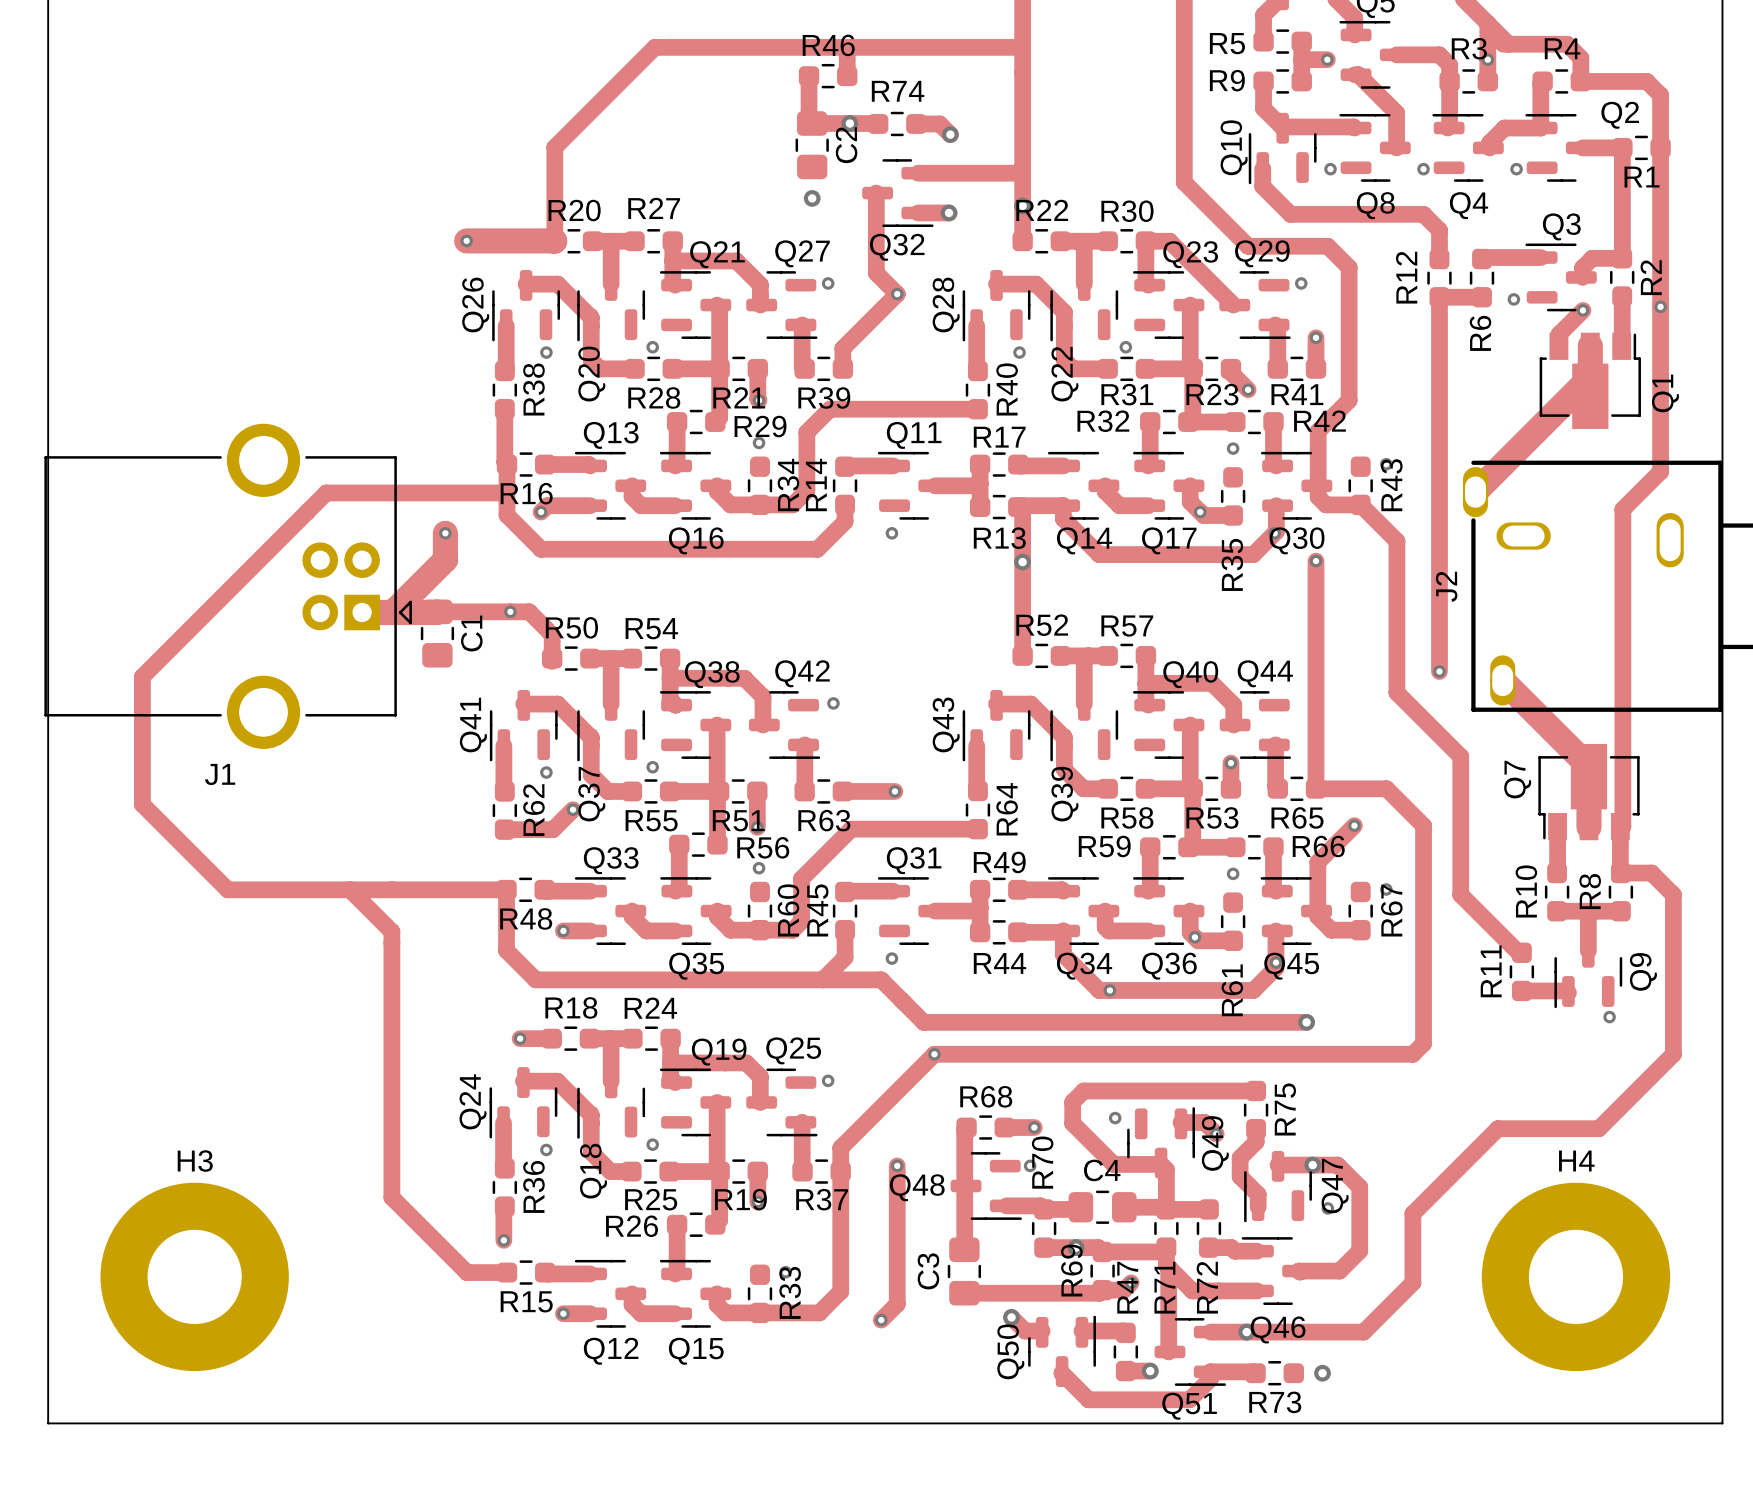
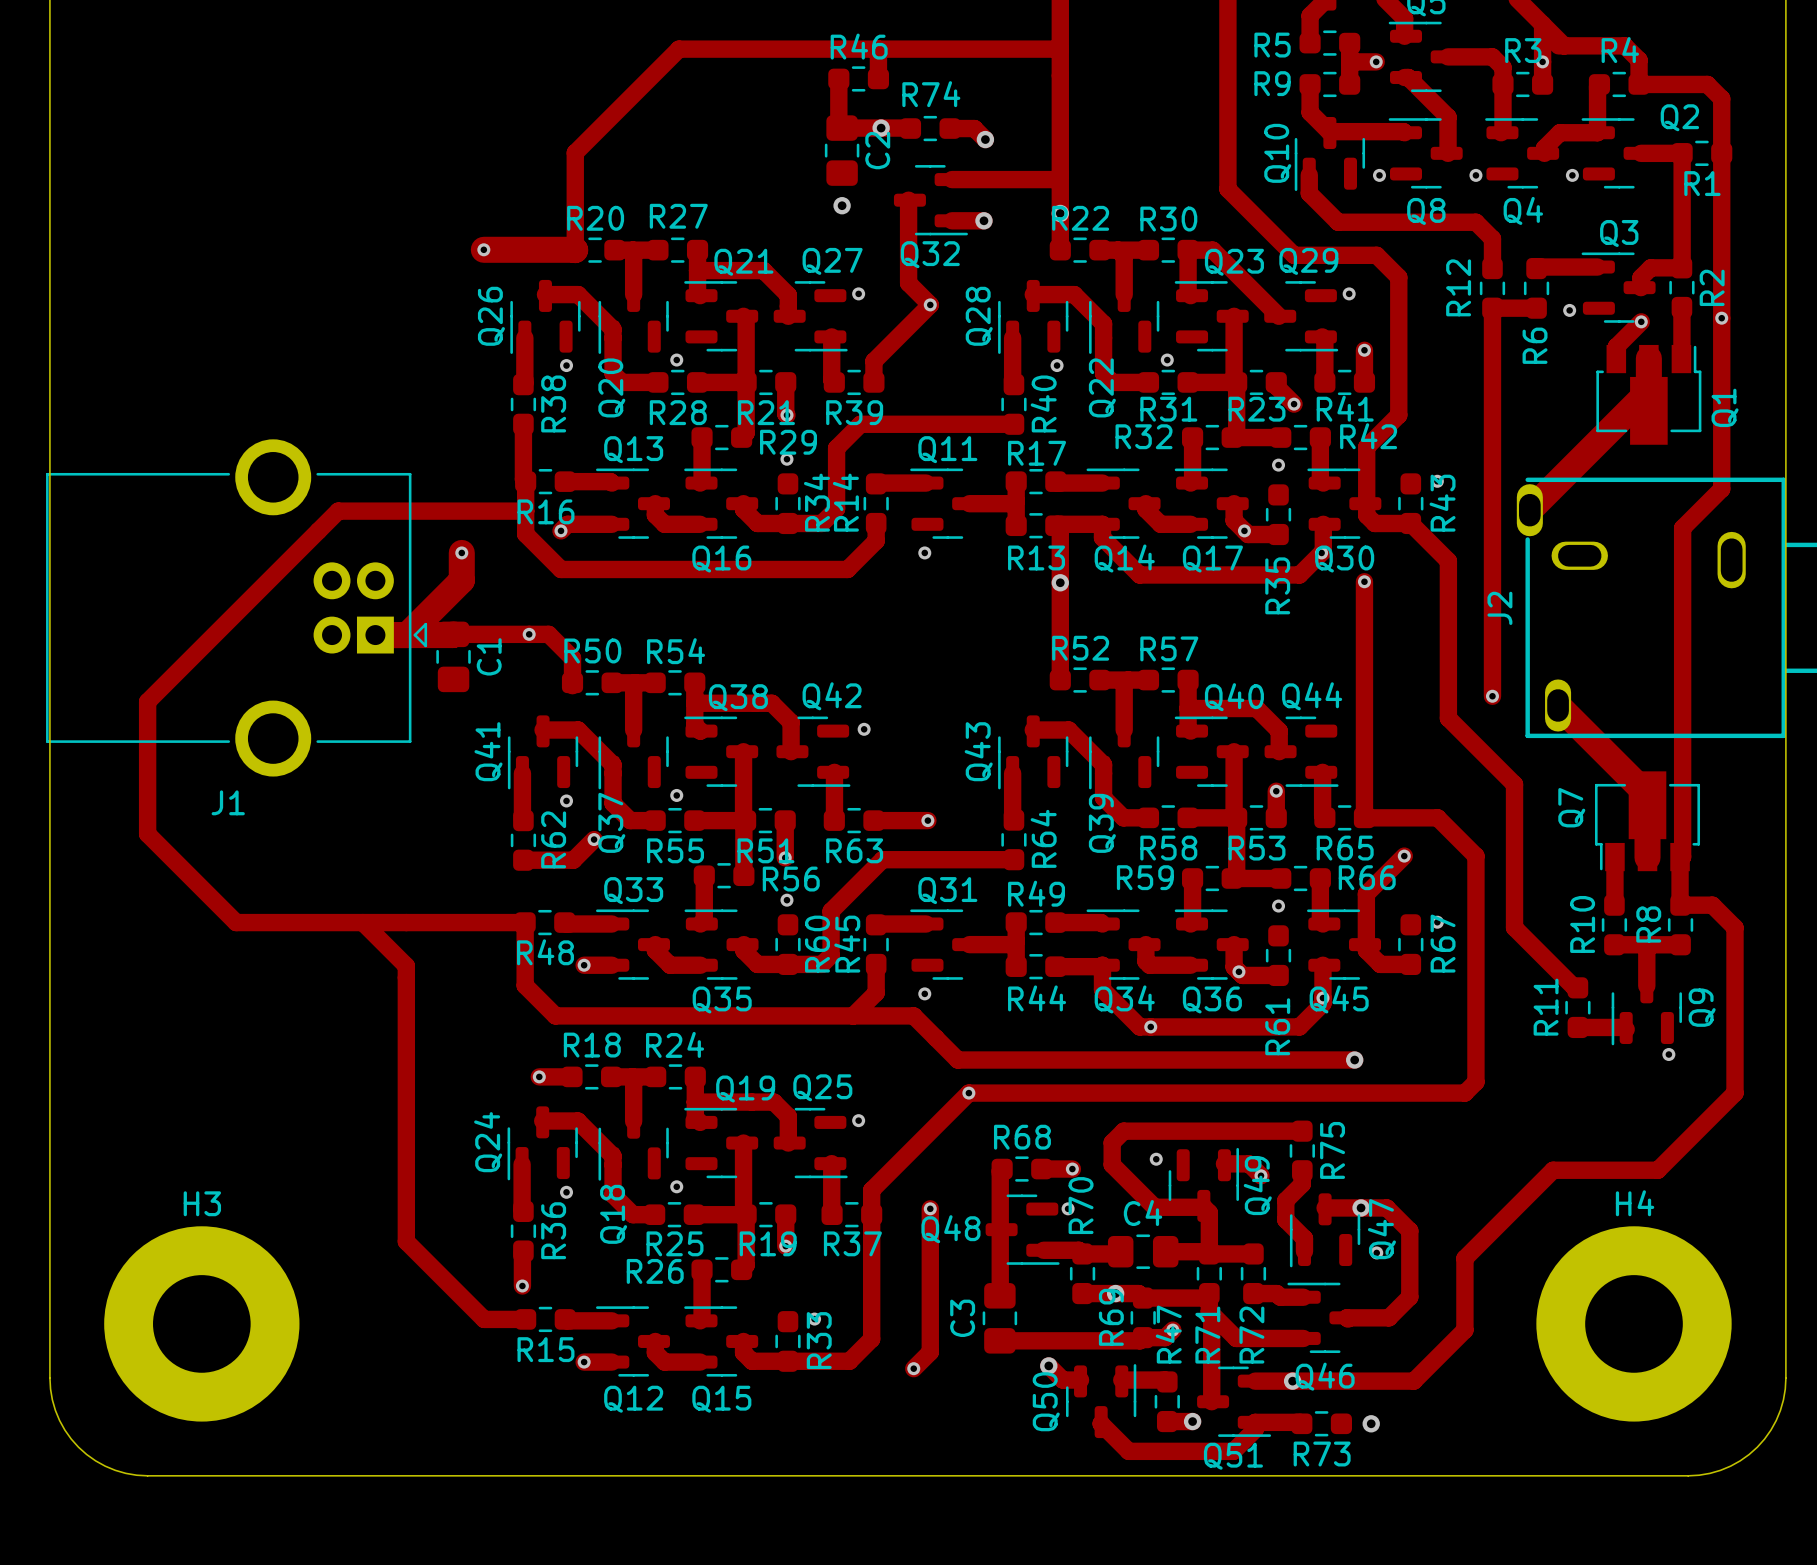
board edge: (48, 1329) (48, 1423) (142, 1423) -> (49, 1378) (52, 1399) (59, 1420) (78, 1447) (95, 1460) (115, 1470) (147, 1475)
board edge: (1722, 1329) (1722, 1423) (1628, 1423) -> (1785, 1378) (1783, 1399) (1776, 1420) (1757, 1447) (1740, 1460) (1720, 1470) (1688, 1475)

